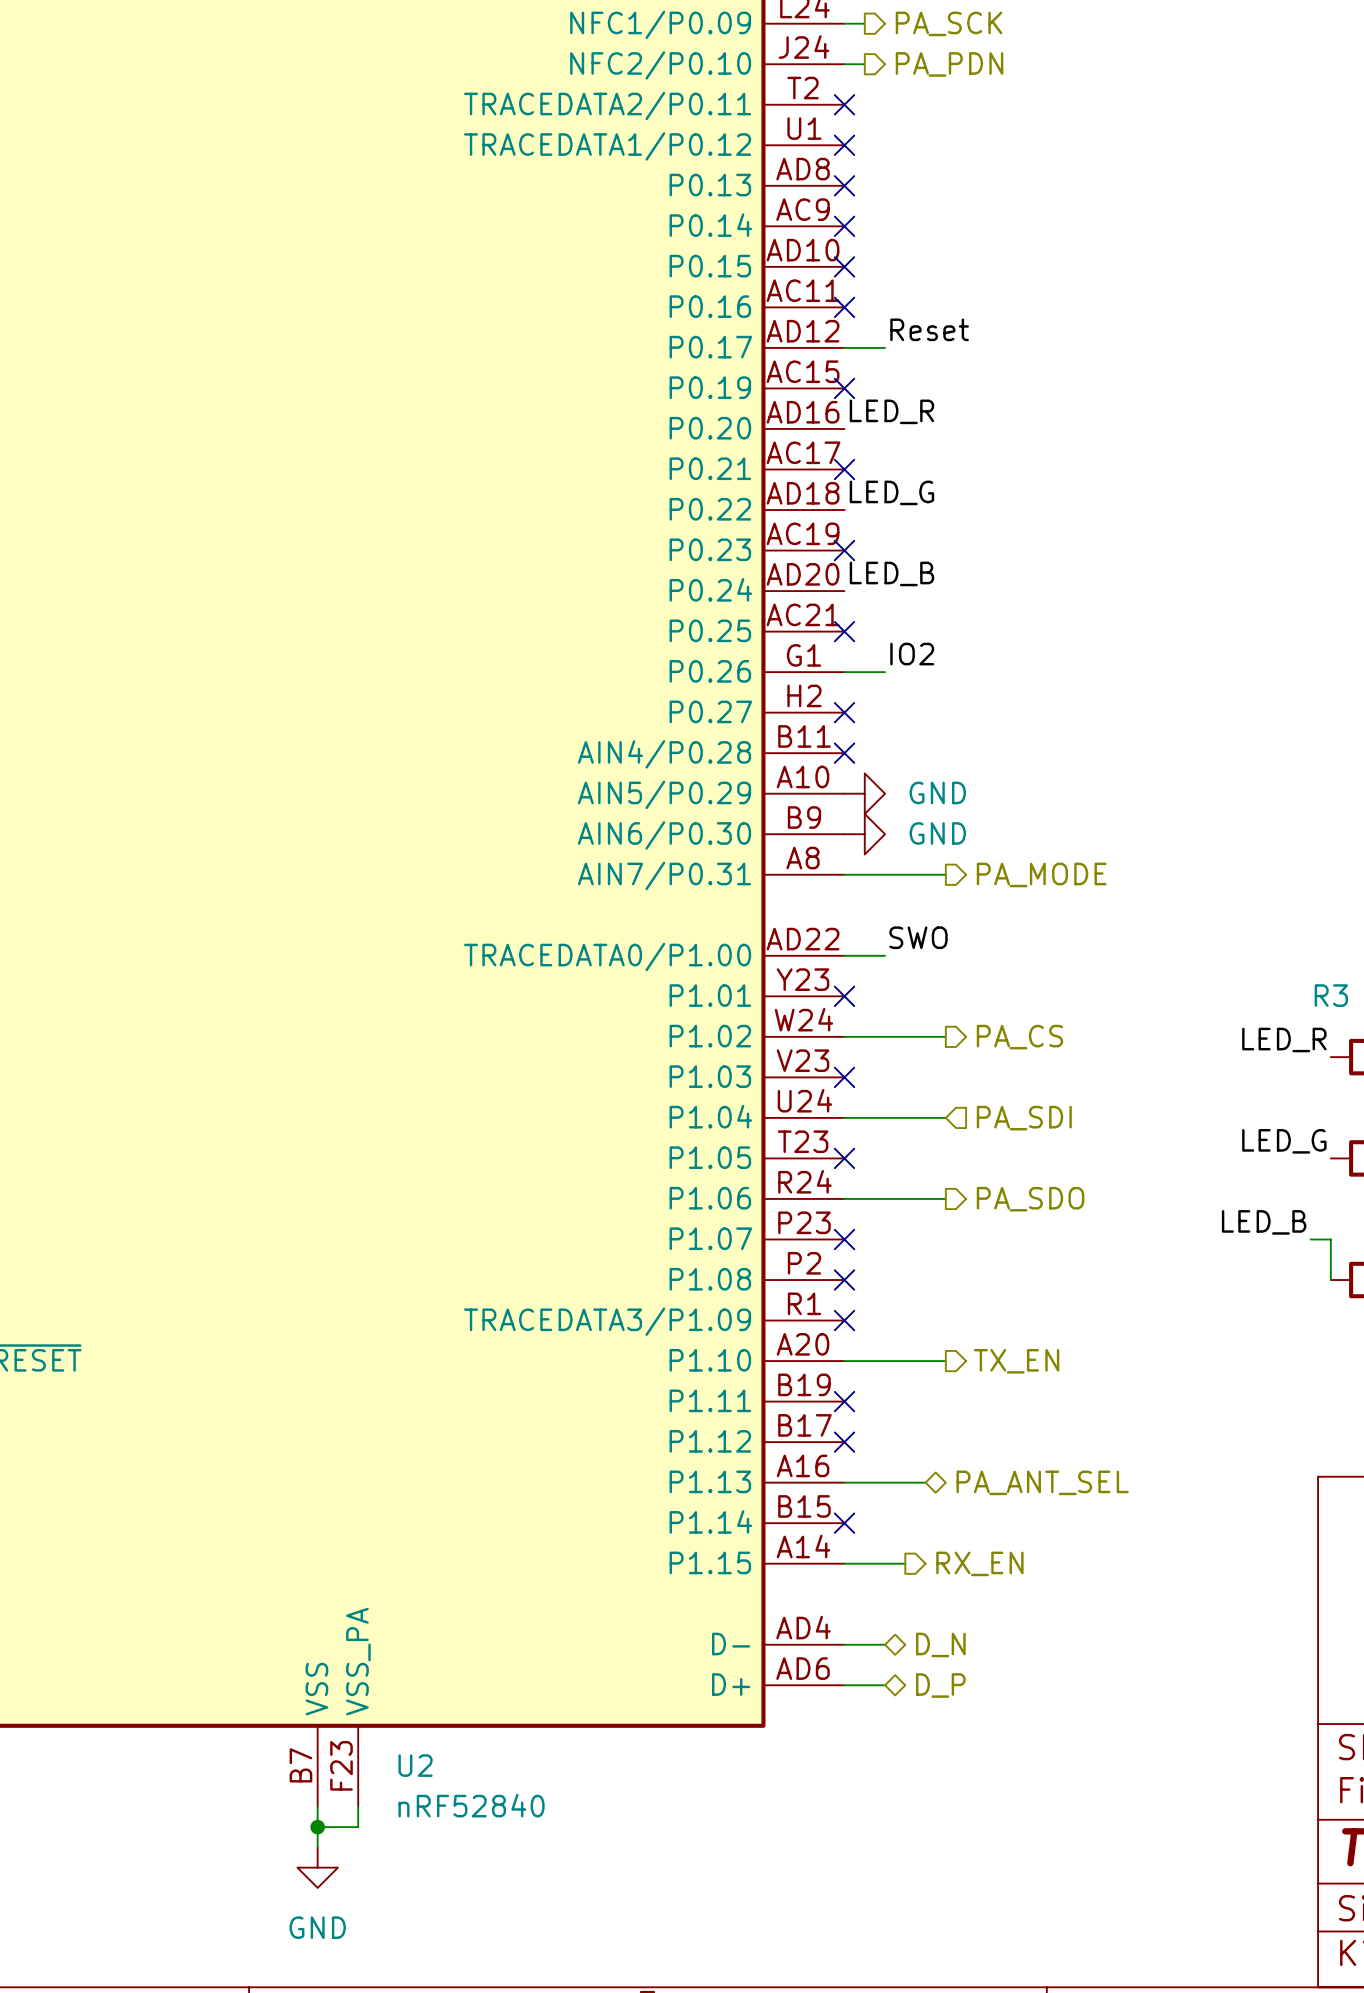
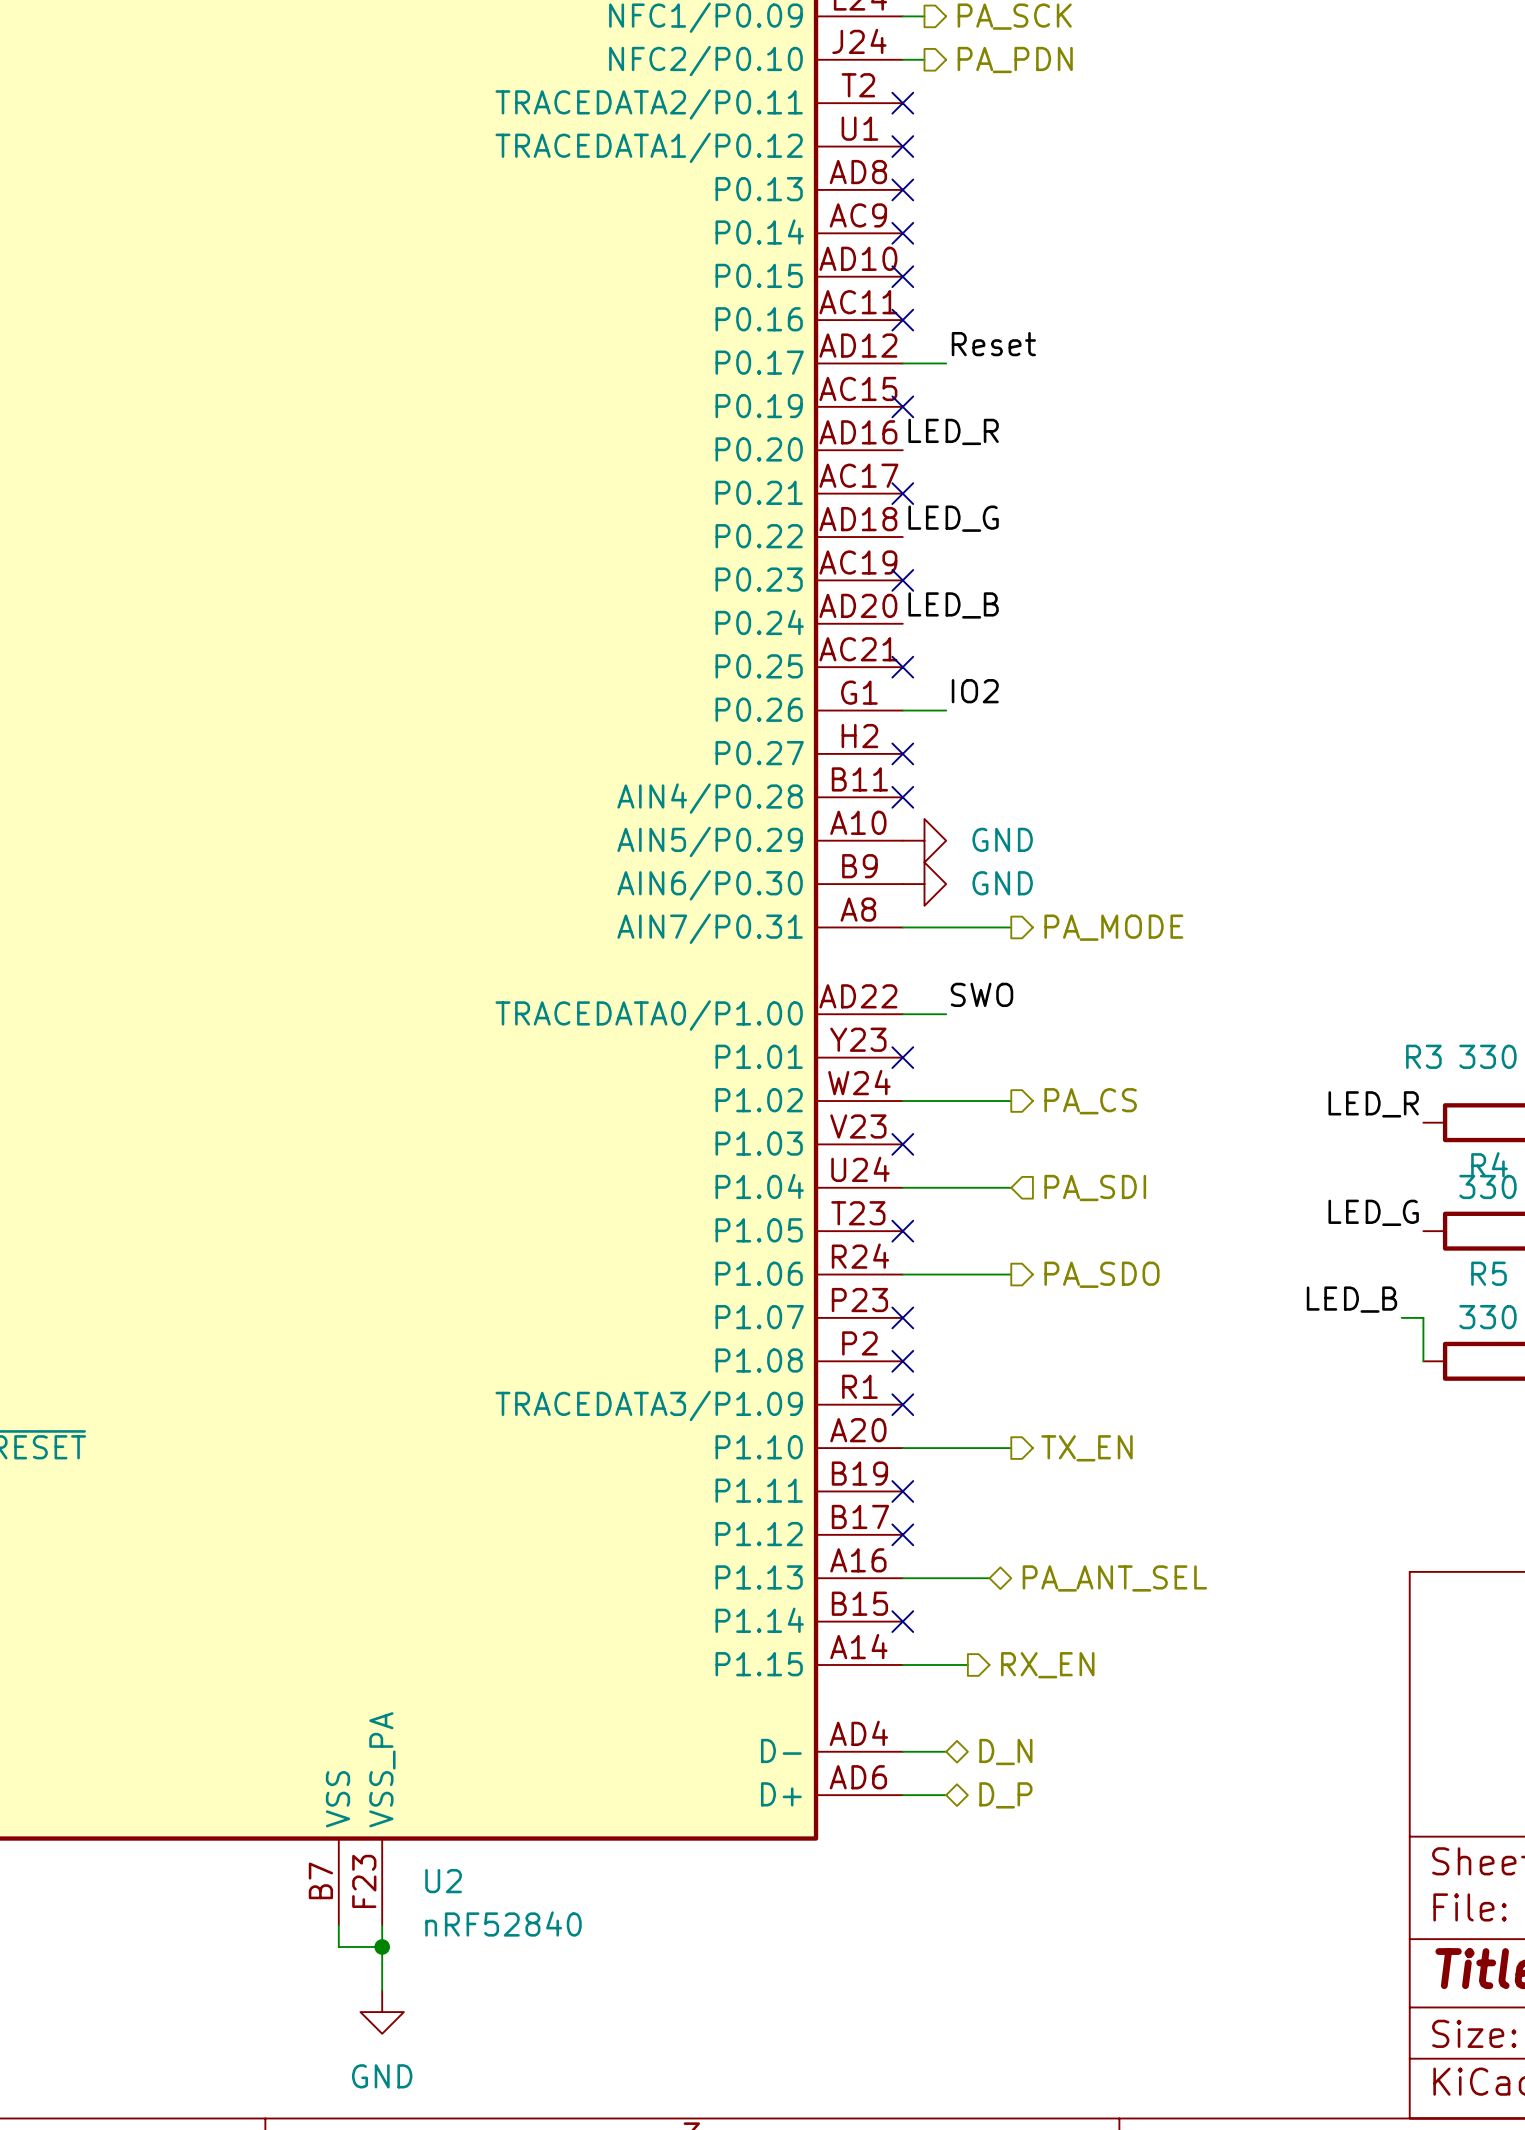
wire: (317, 1827) (317, 1847) -> none
junction position: (317, 1827) -> (382, 1946)
wire: none -> (382, 1946) (382, 1990)
power symbol position: GND (317, 1867) -> GND (382, 2012)

